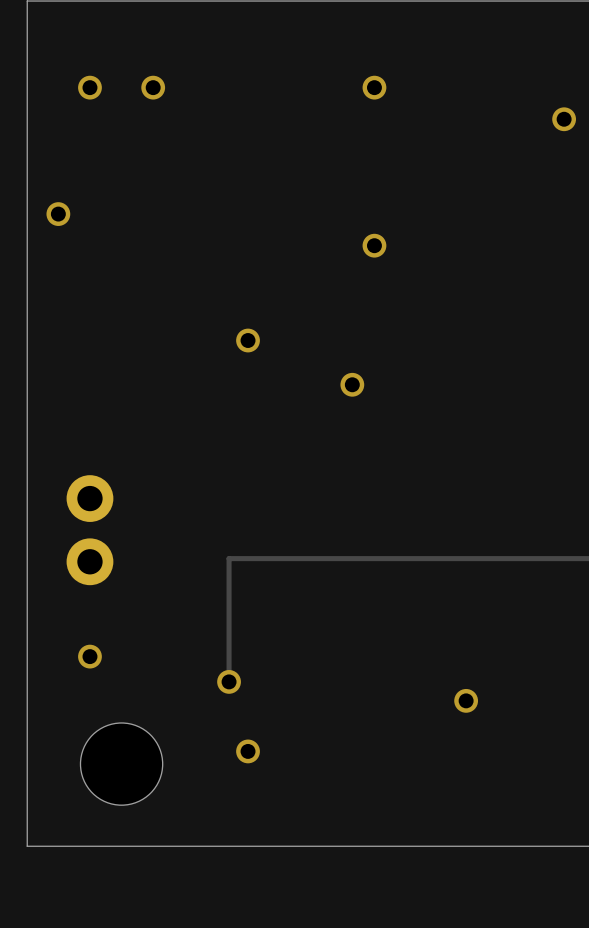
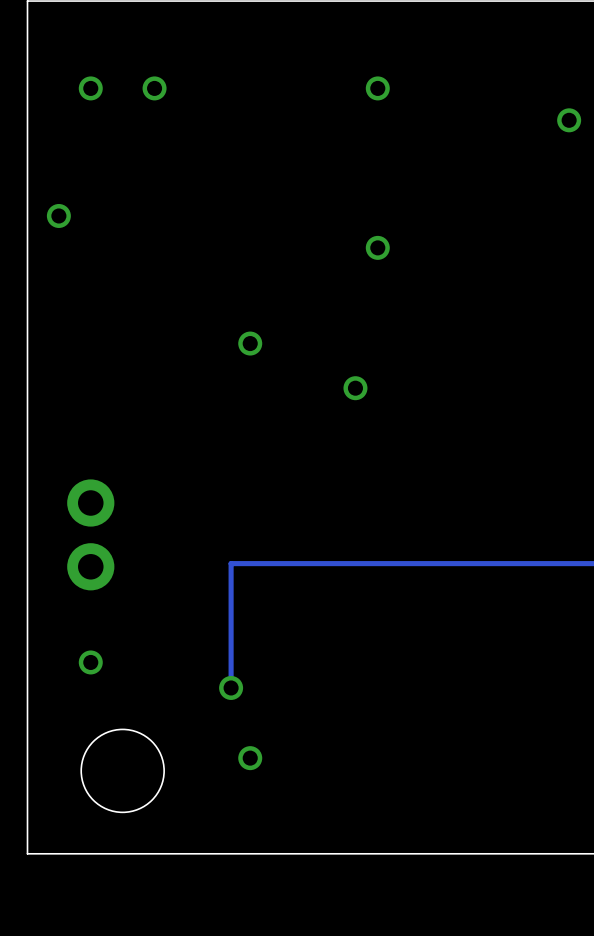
via: (466, 700) -> none

